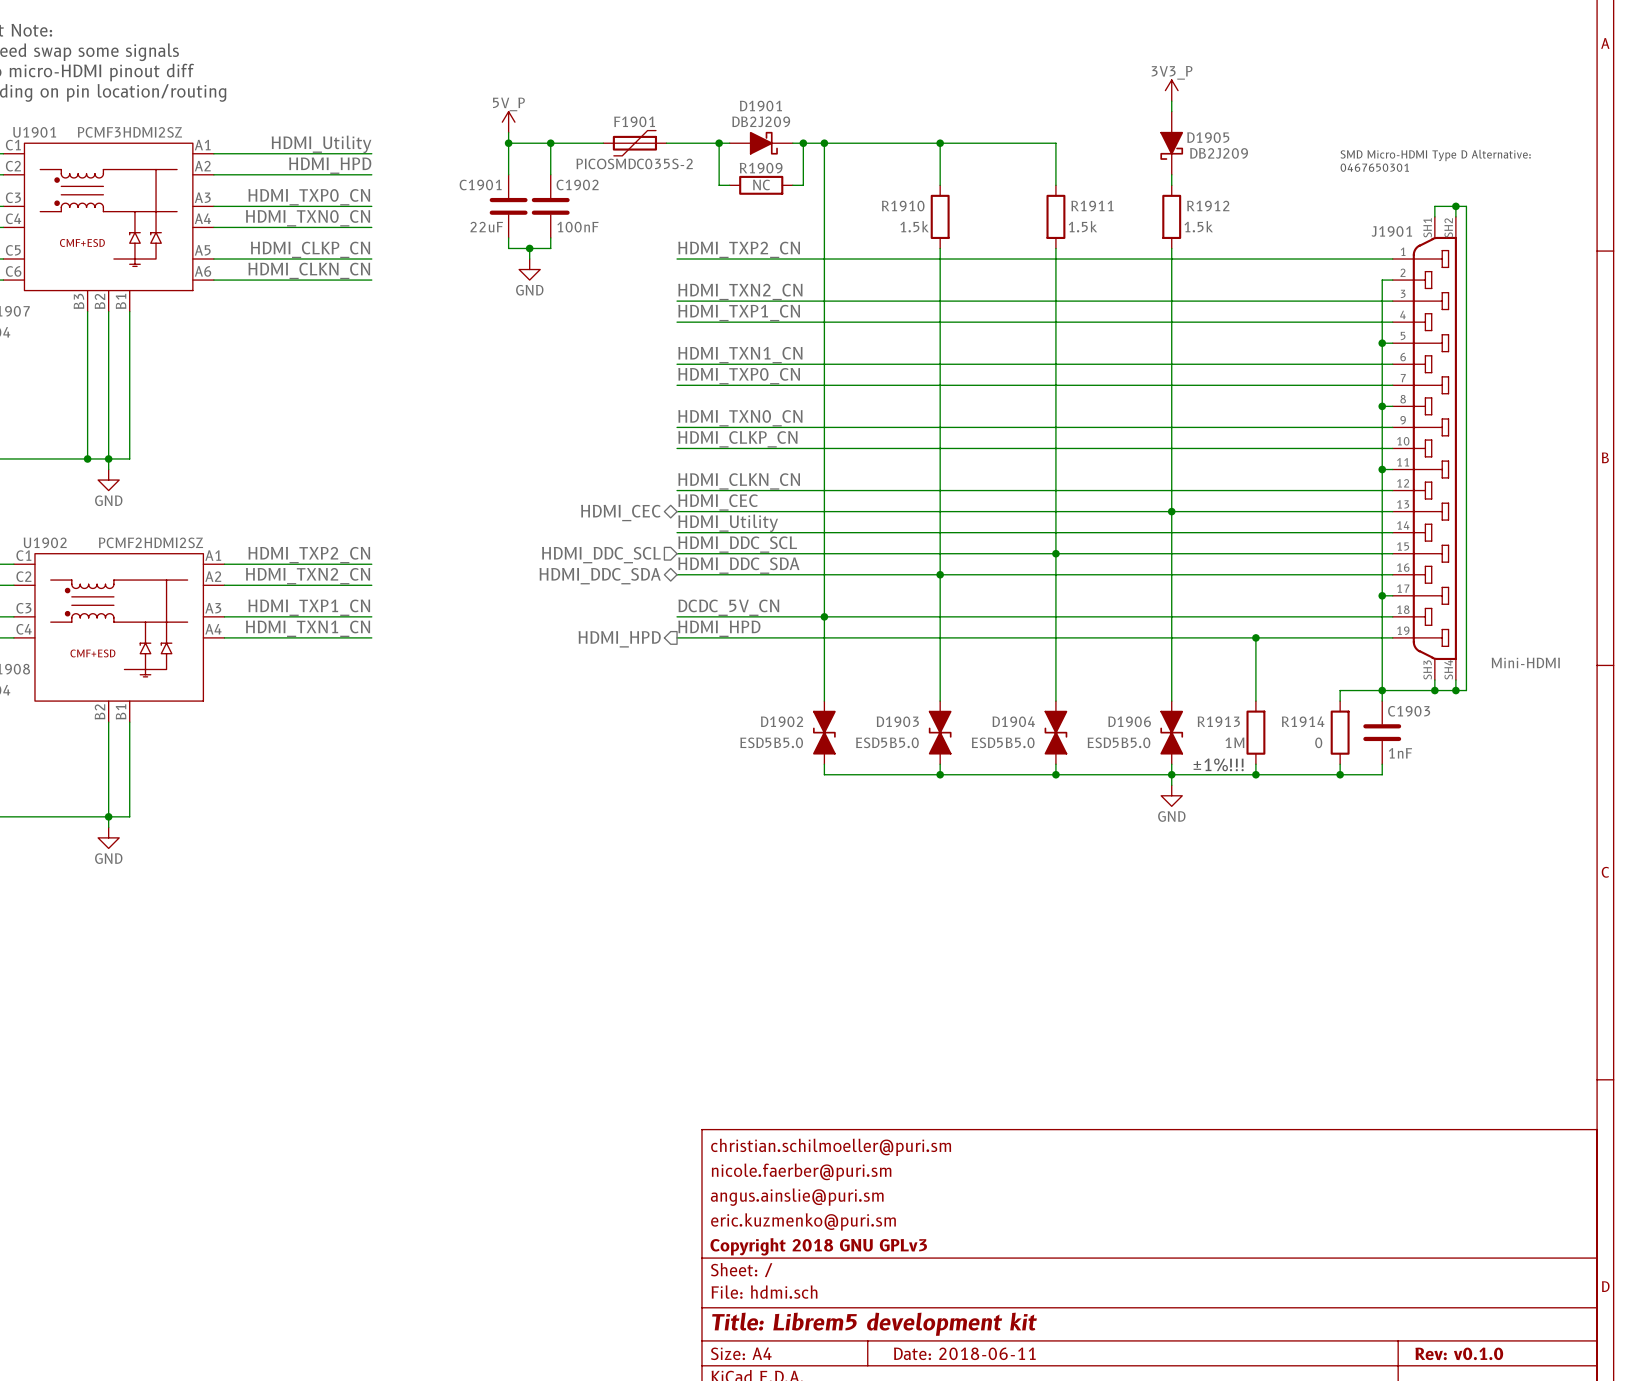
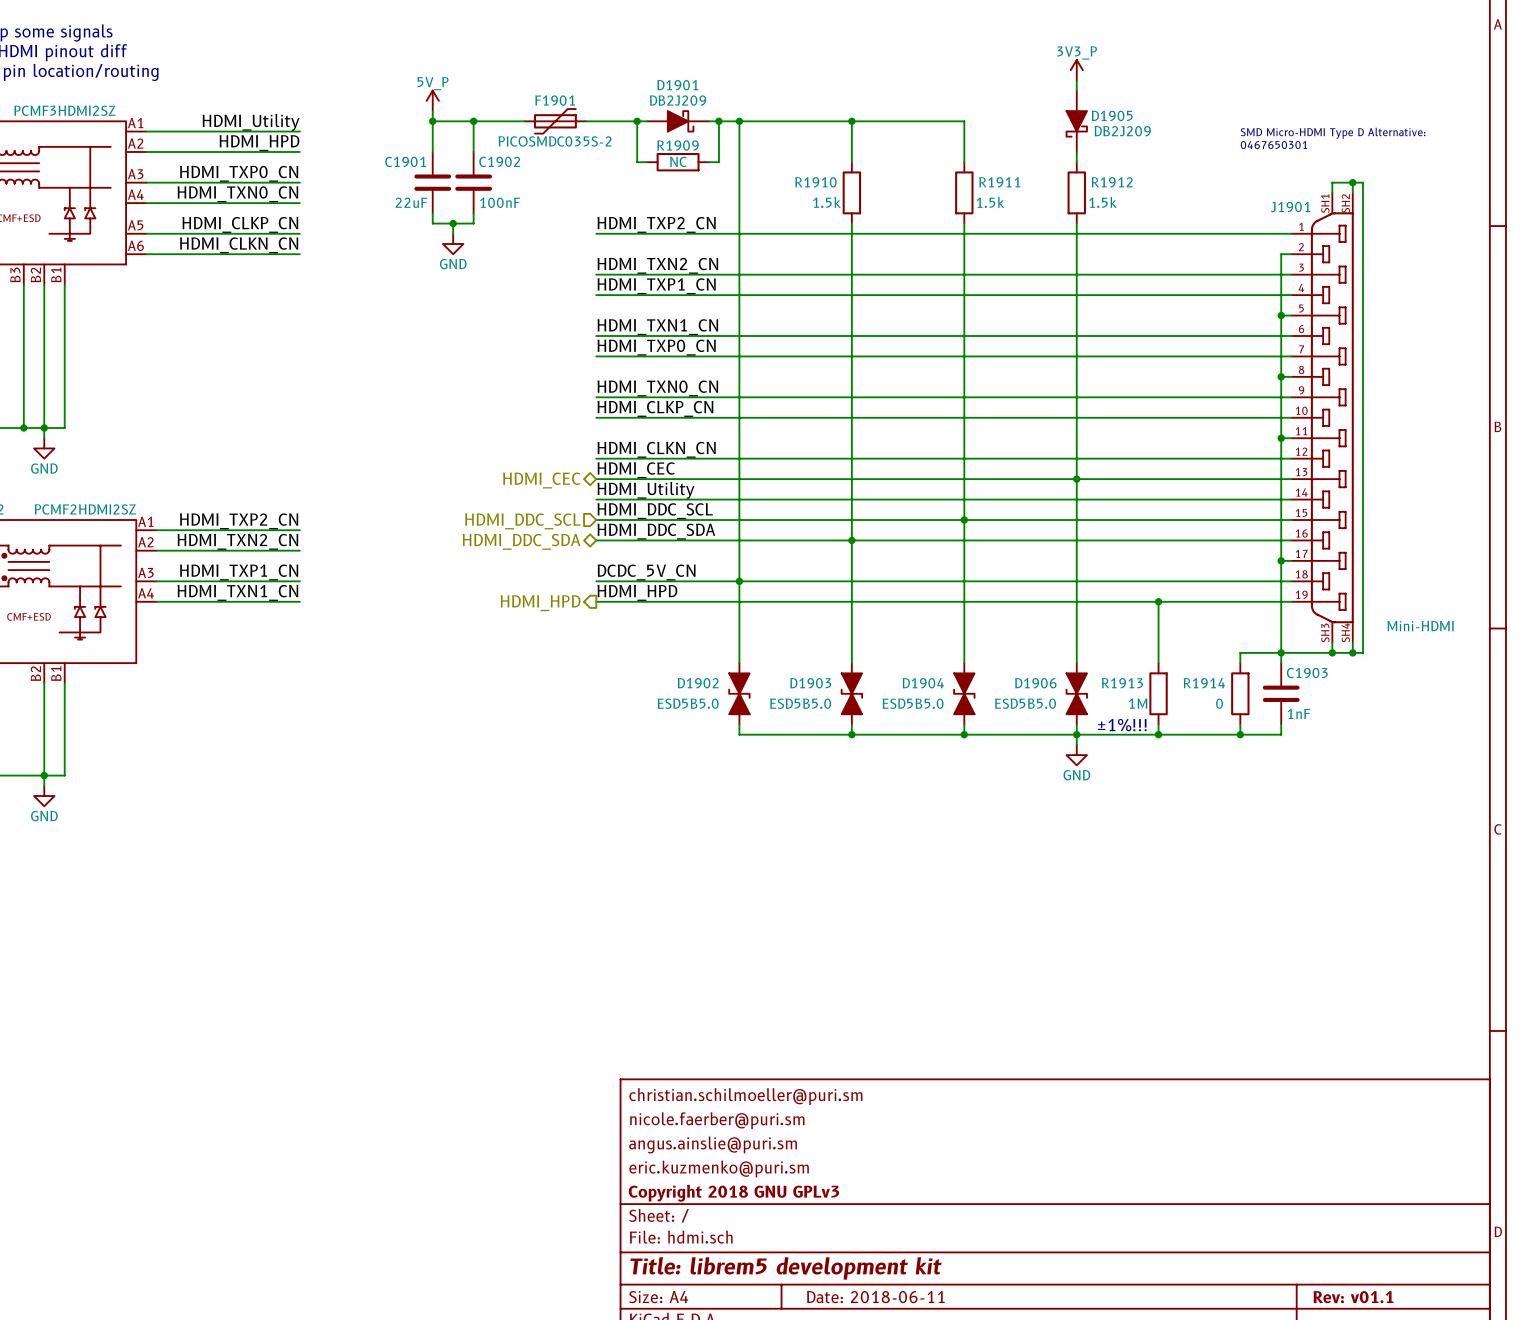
title block: Title: Librem5 development kit (874, 1324) -> Title: librem5 development kit (786, 1268)
title block: Rev: v0.1.0 (1459, 1353) -> Rev: v01.1 (1353, 1297)

